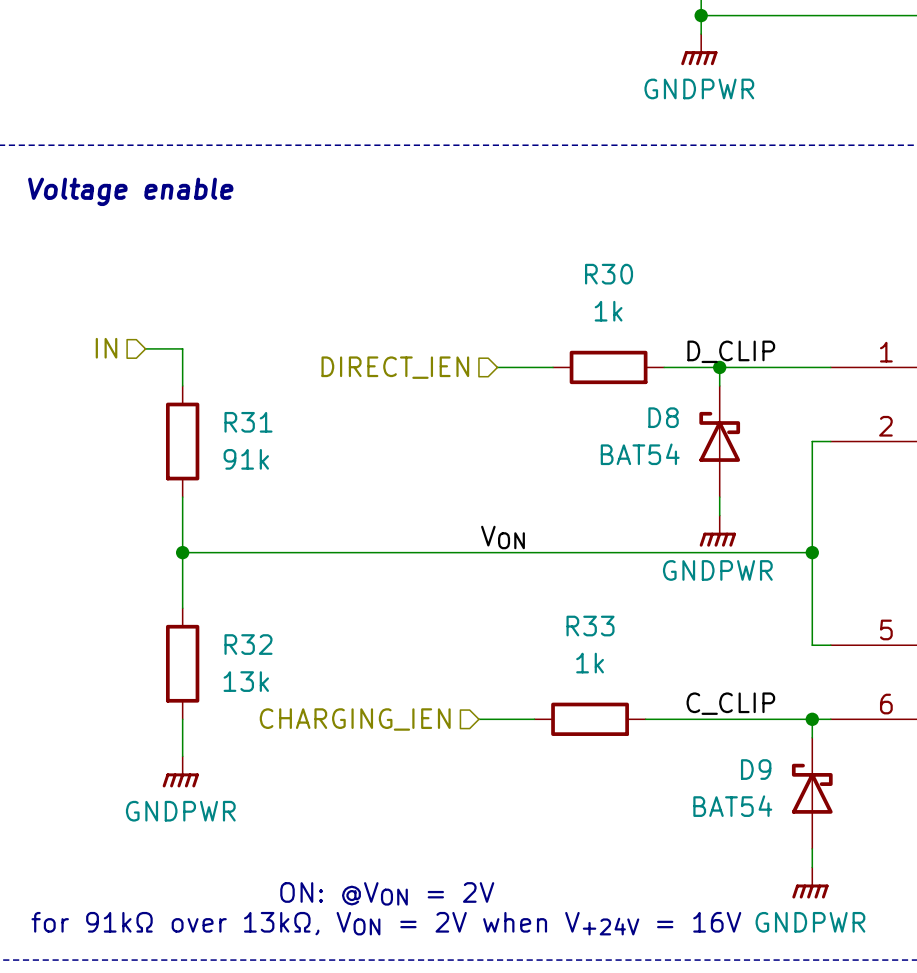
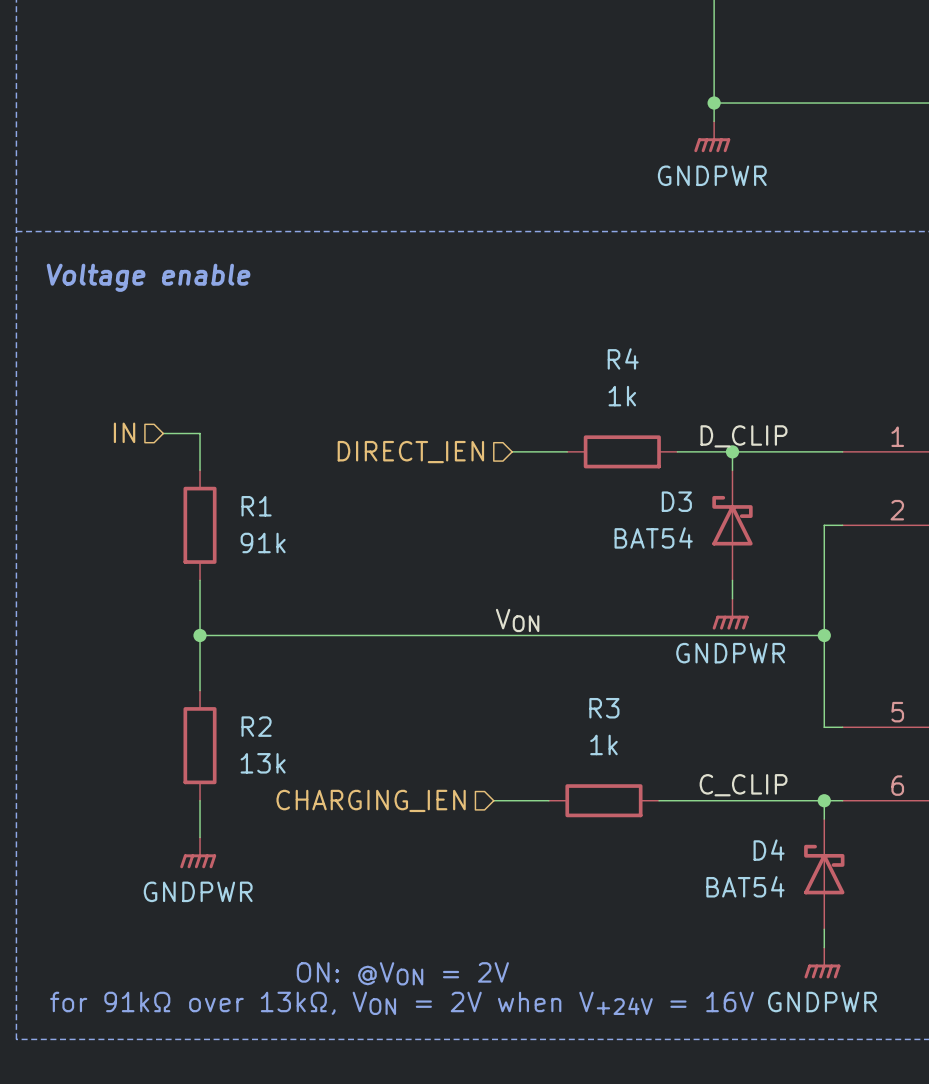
R30 name: R30 (609, 274) -> R4 (623, 358)
D8 name: D8 (663, 417) -> D3 (676, 501)
R31 name: R31 (248, 422) -> R1 (256, 506)
R33 name: R33 (590, 626) -> R3 (604, 708)
R32 name: R32 (248, 644) -> R2 (256, 726)
D9 name: D9 (756, 769) -> D4 (769, 850)

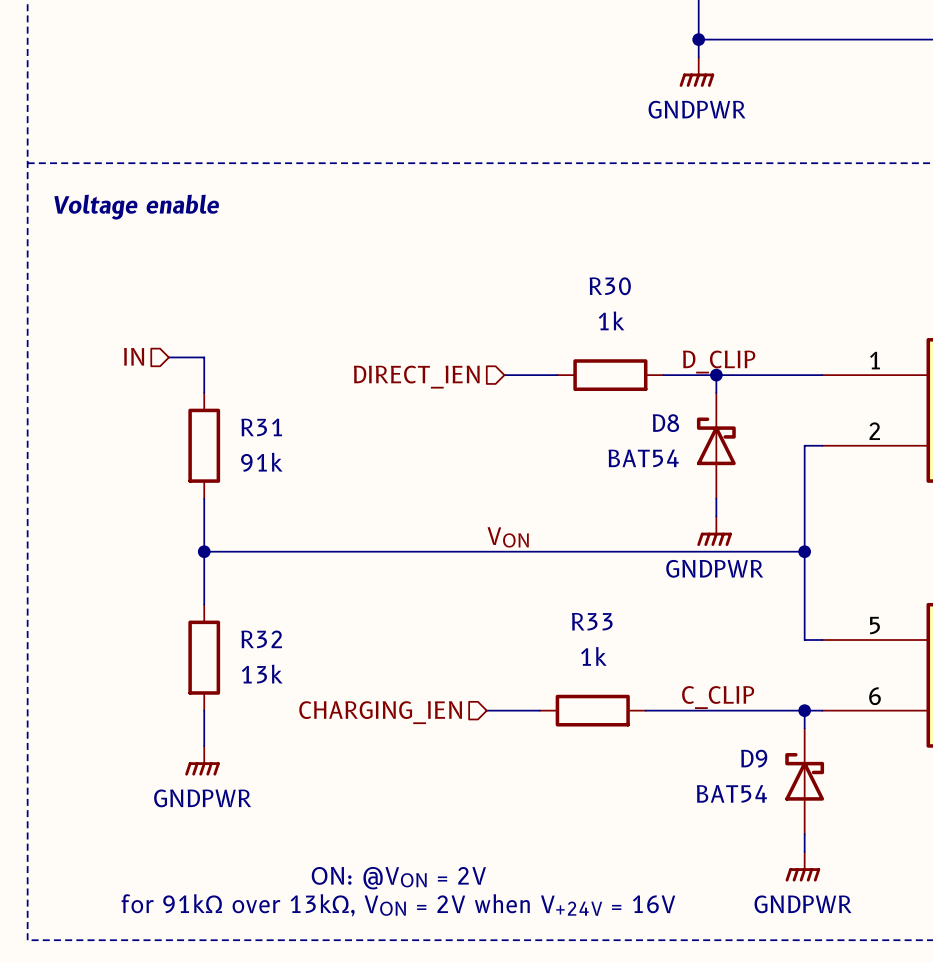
R4 name: R4 (623, 358) -> R30 (610, 286)
D3 name: D3 (676, 501) -> D8 (665, 423)
R1 name: R1 (256, 506) -> R31 (261, 427)
R3 name: R3 (604, 708) -> R33 (592, 621)
R2 name: R2 (256, 726) -> R32 (261, 639)
D4 name: D4 (769, 850) -> D9 (754, 758)

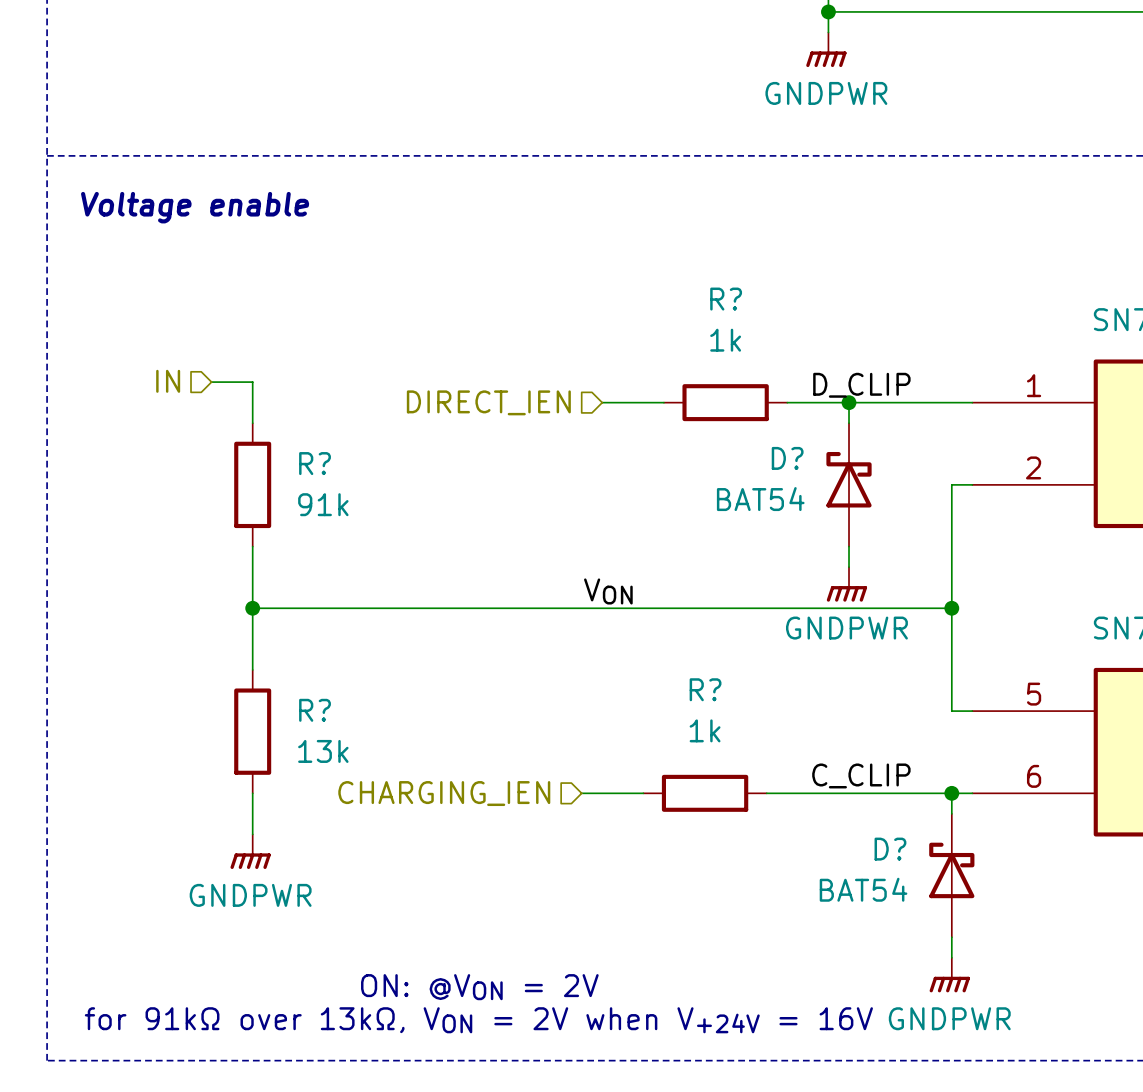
R30 name: R30 (610, 286) -> R? (726, 299)
D8 name: D8 (665, 423) -> D? (787, 458)
R31 name: R31 (261, 427) -> R? (315, 463)
R33 name: R33 (592, 621) -> R? (705, 689)
R32 name: R32 (261, 639) -> R? (315, 710)
D9 name: D9 (754, 758) -> D? (890, 849)

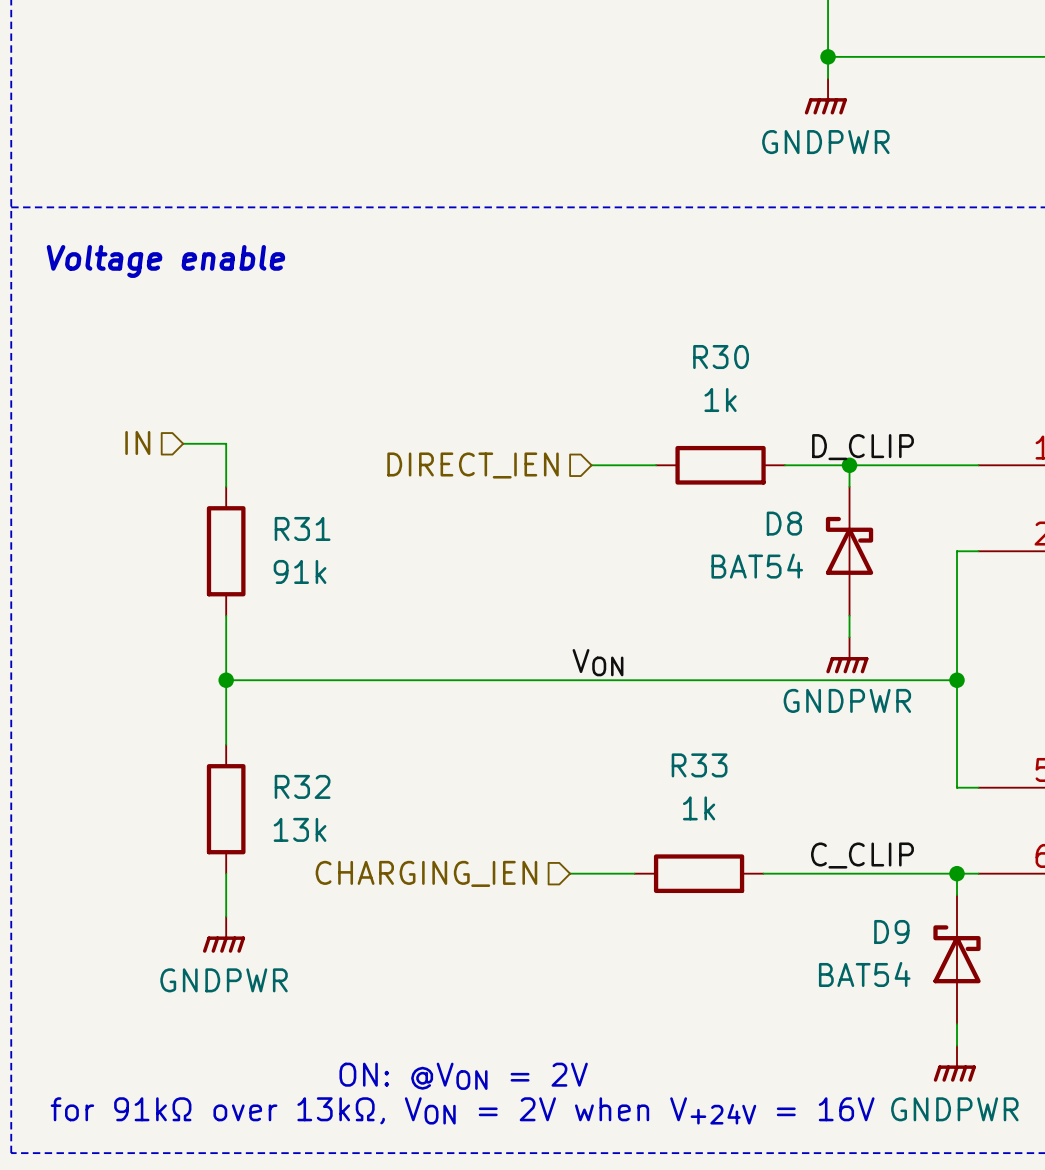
R? name: R? (726, 299) -> R30 (721, 357)
D? name: D? (787, 458) -> D8 (784, 523)
R? name: R? (315, 463) -> R31 (302, 528)
R? name: R? (705, 689) -> R33 (699, 765)
R? name: R? (315, 710) -> R32 (302, 786)
D? name: D? (890, 849) -> D9 (891, 931)

